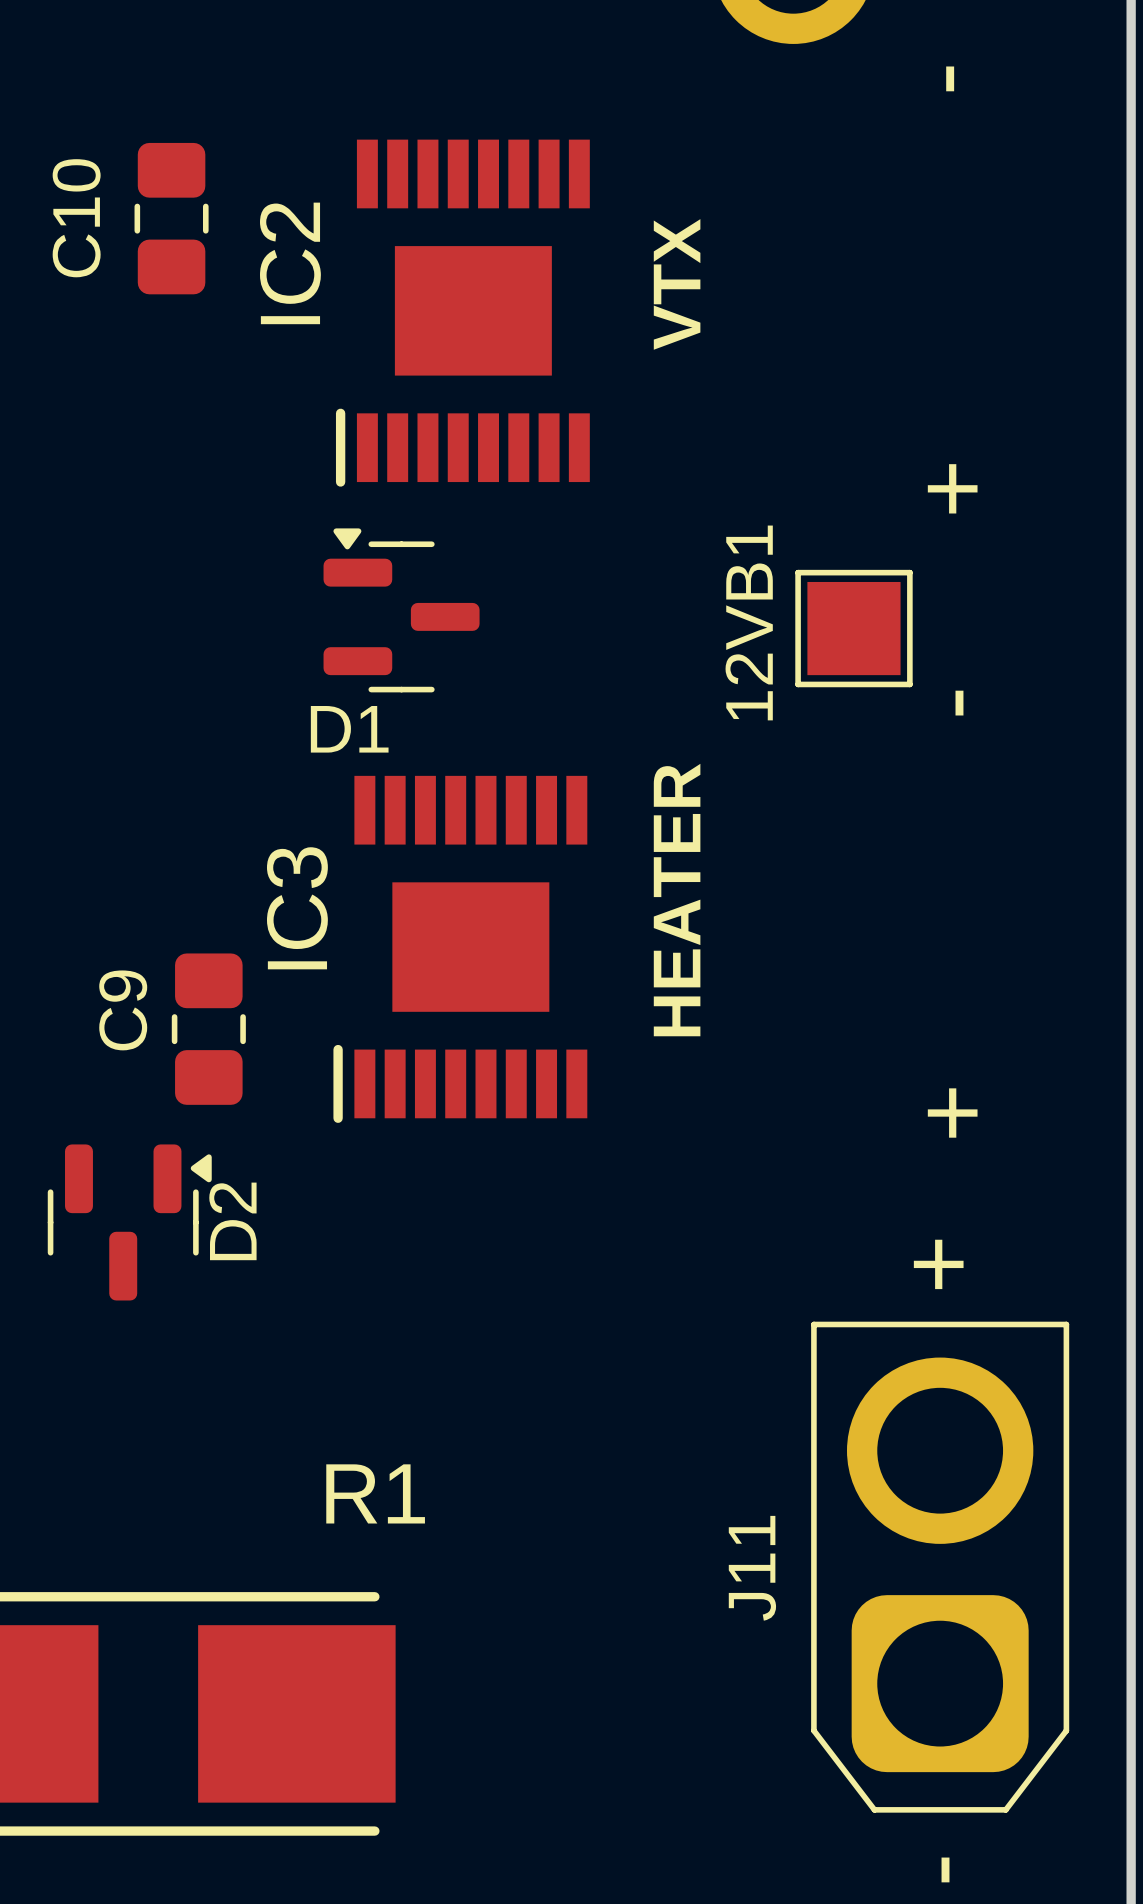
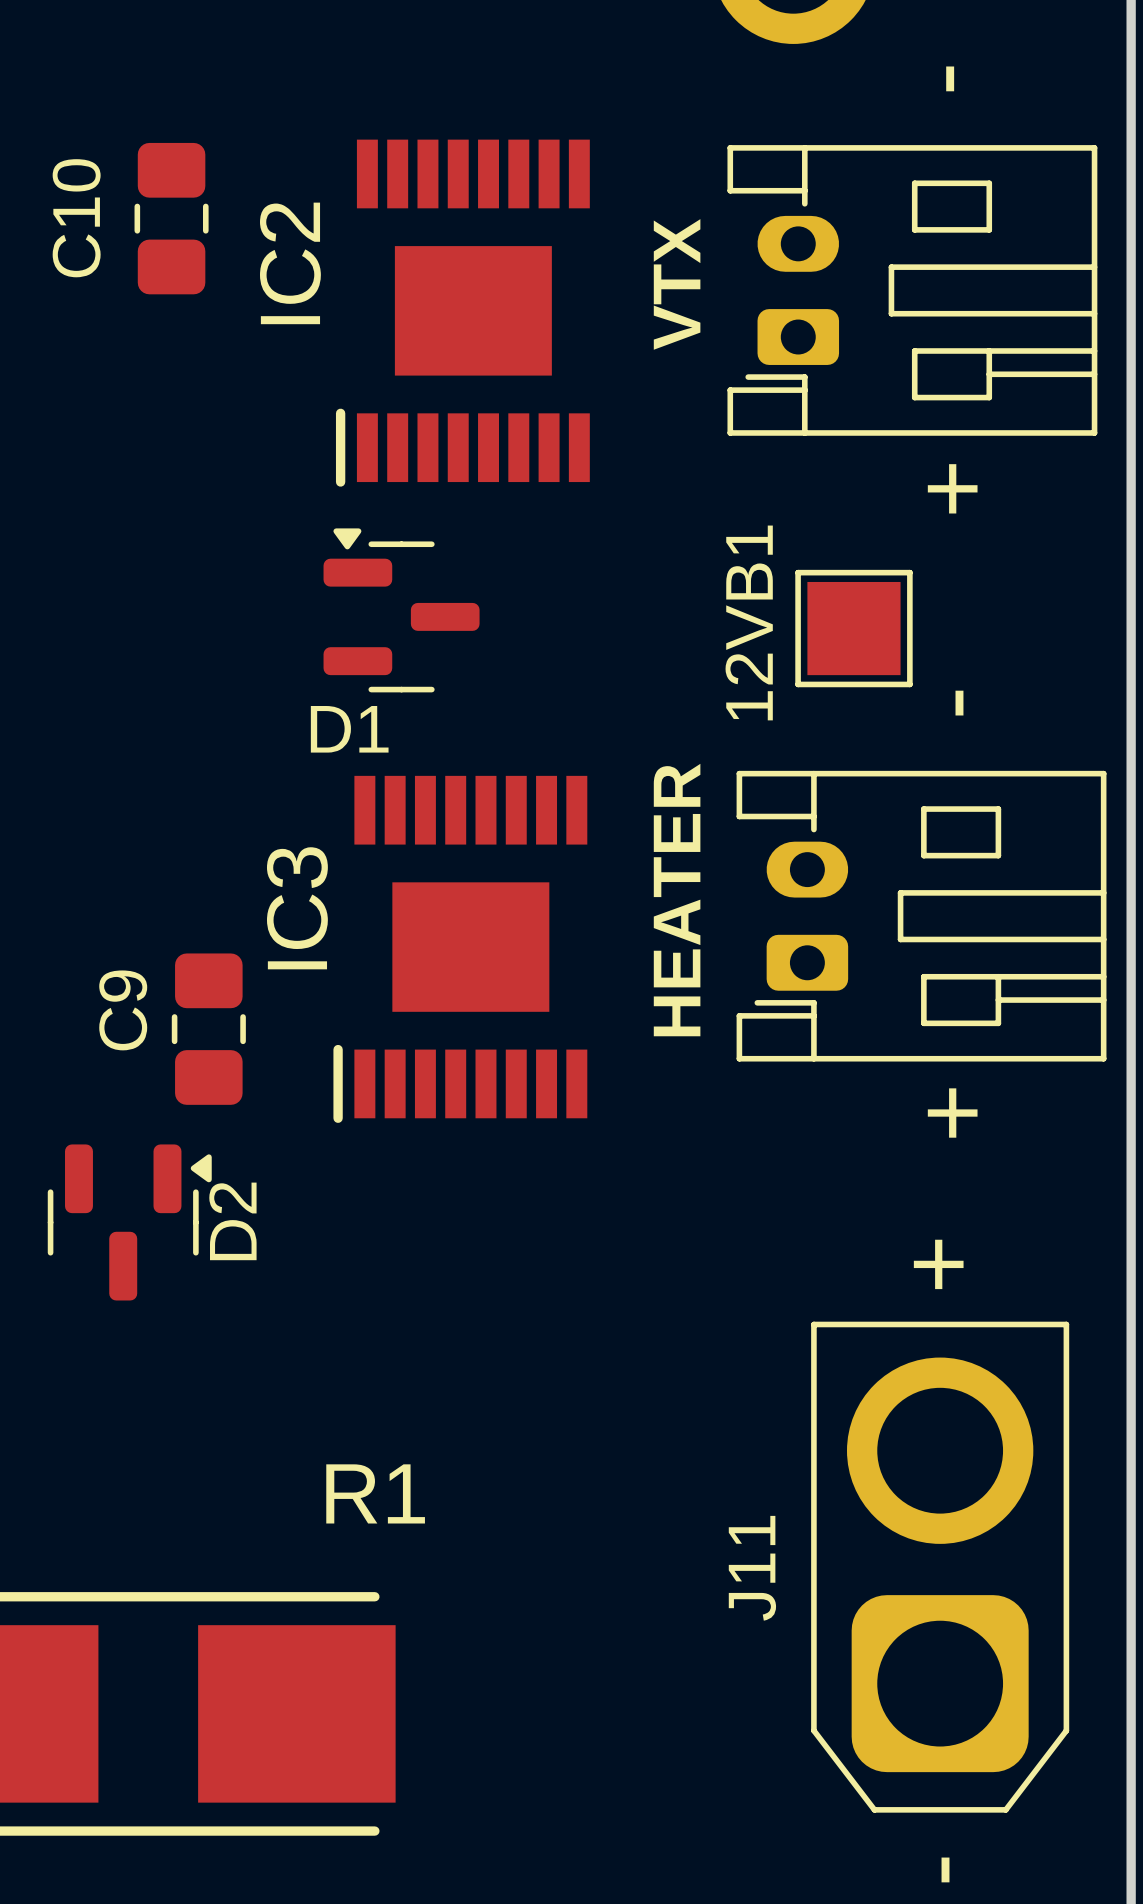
part: none -> (912, 290)
part: none -> (921, 916)

